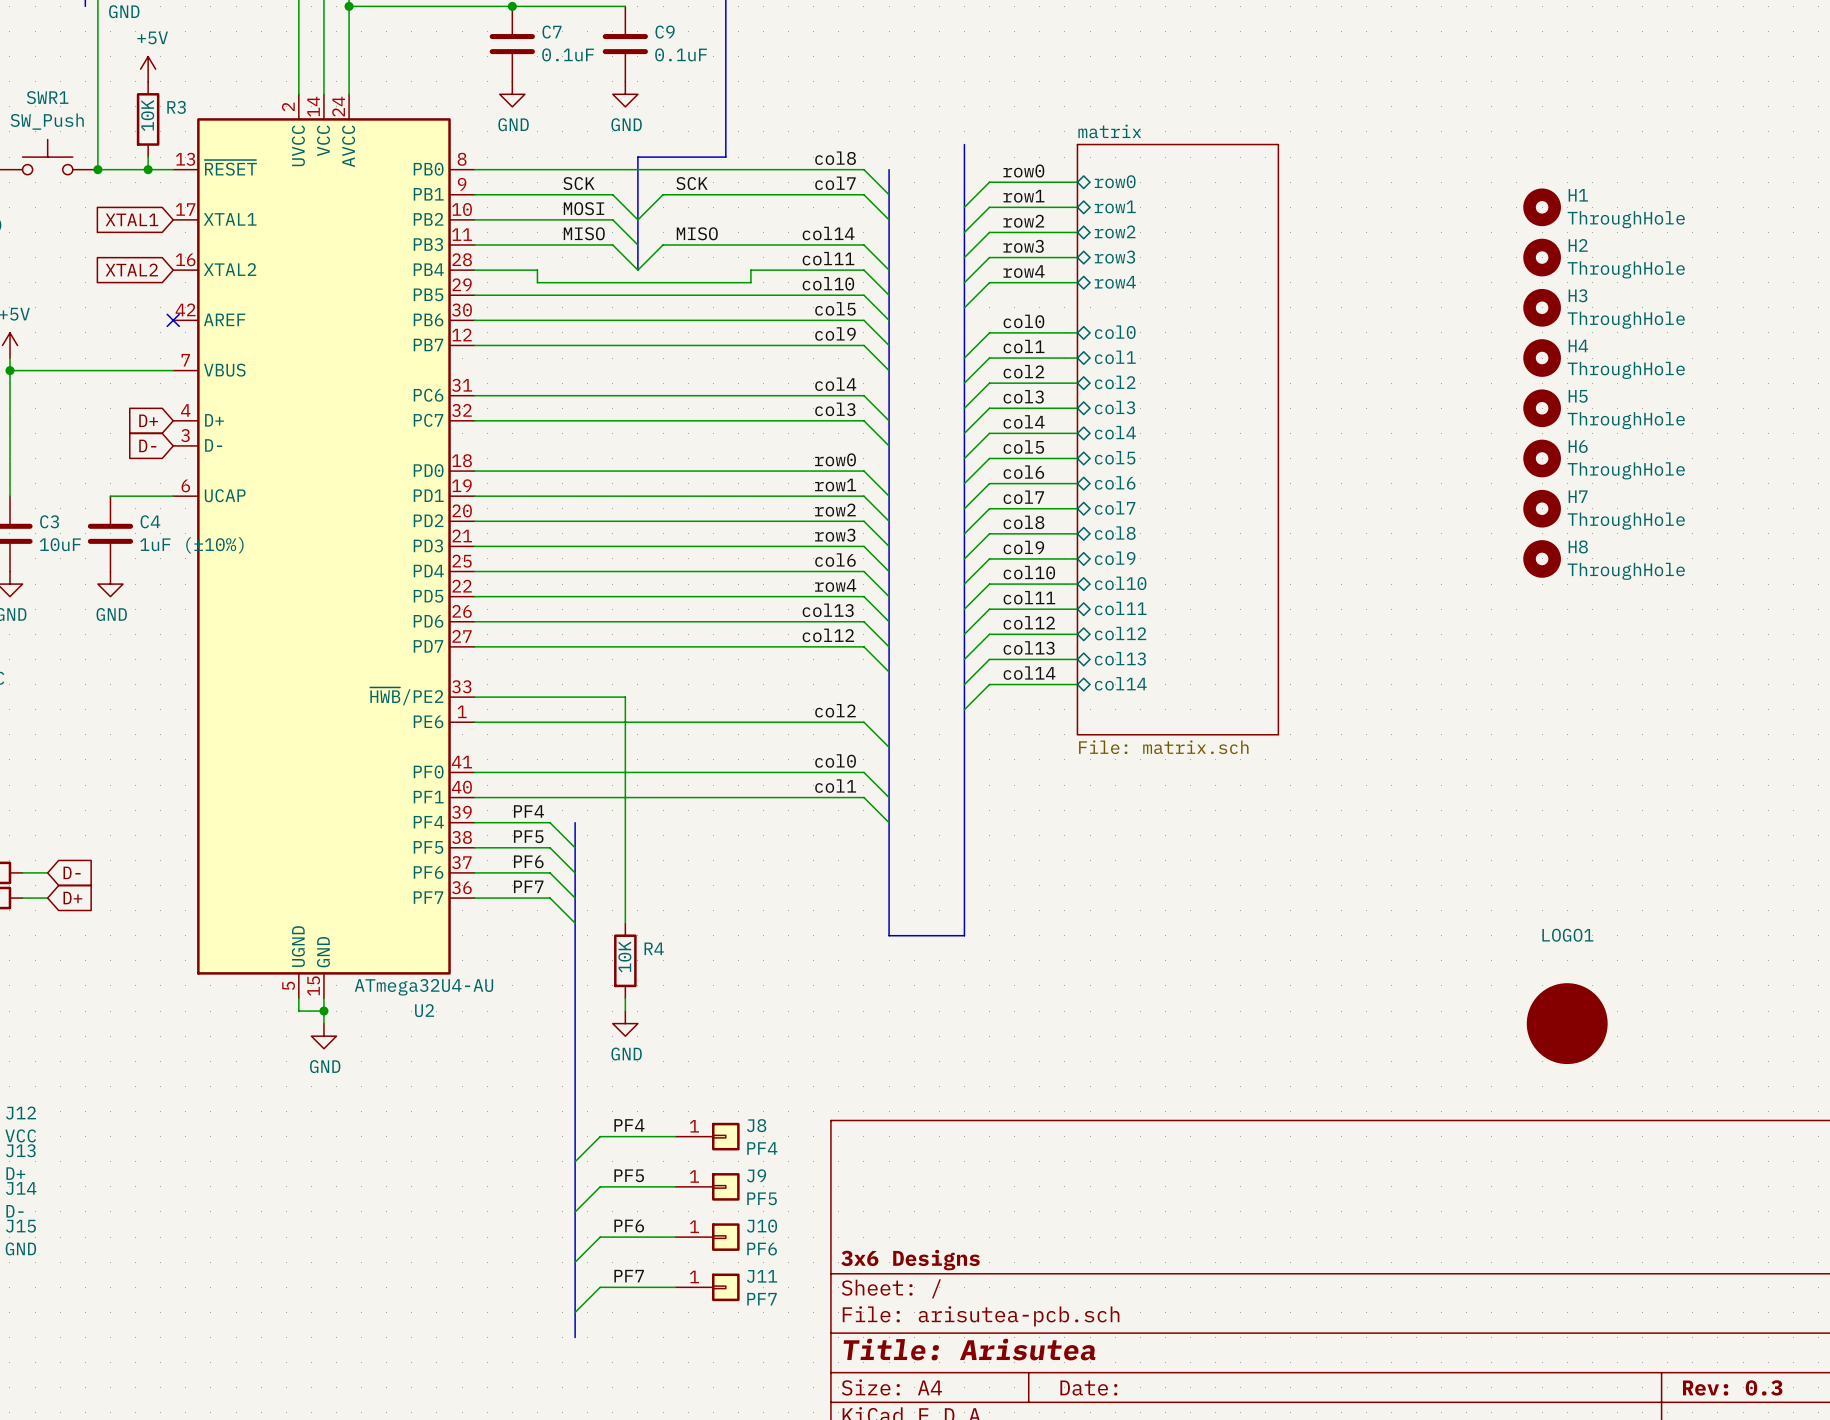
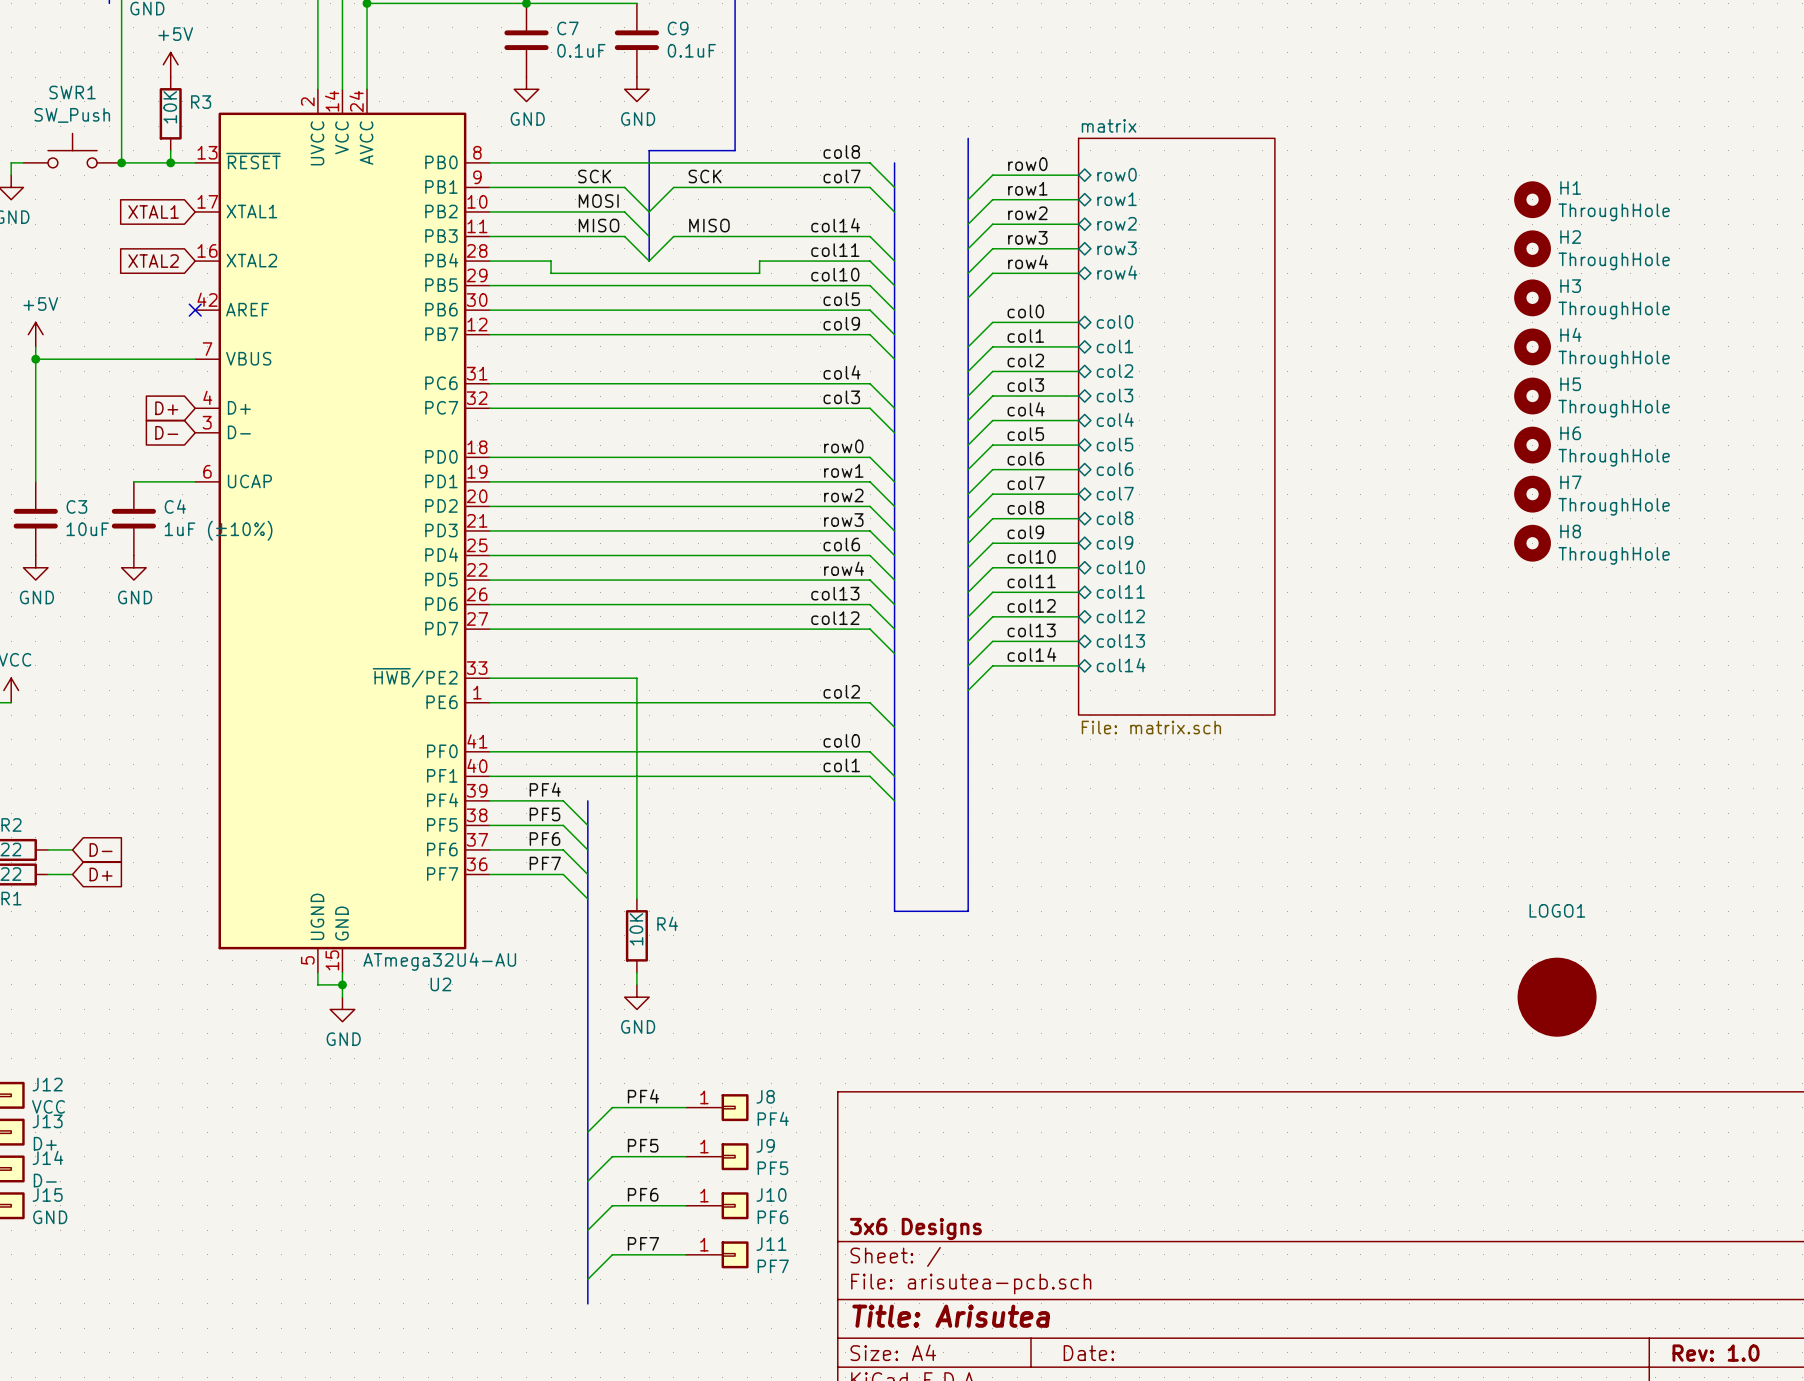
title block: Rev: 0.3 (1732, 1387) -> Rev: 1.0 (1716, 1353)

